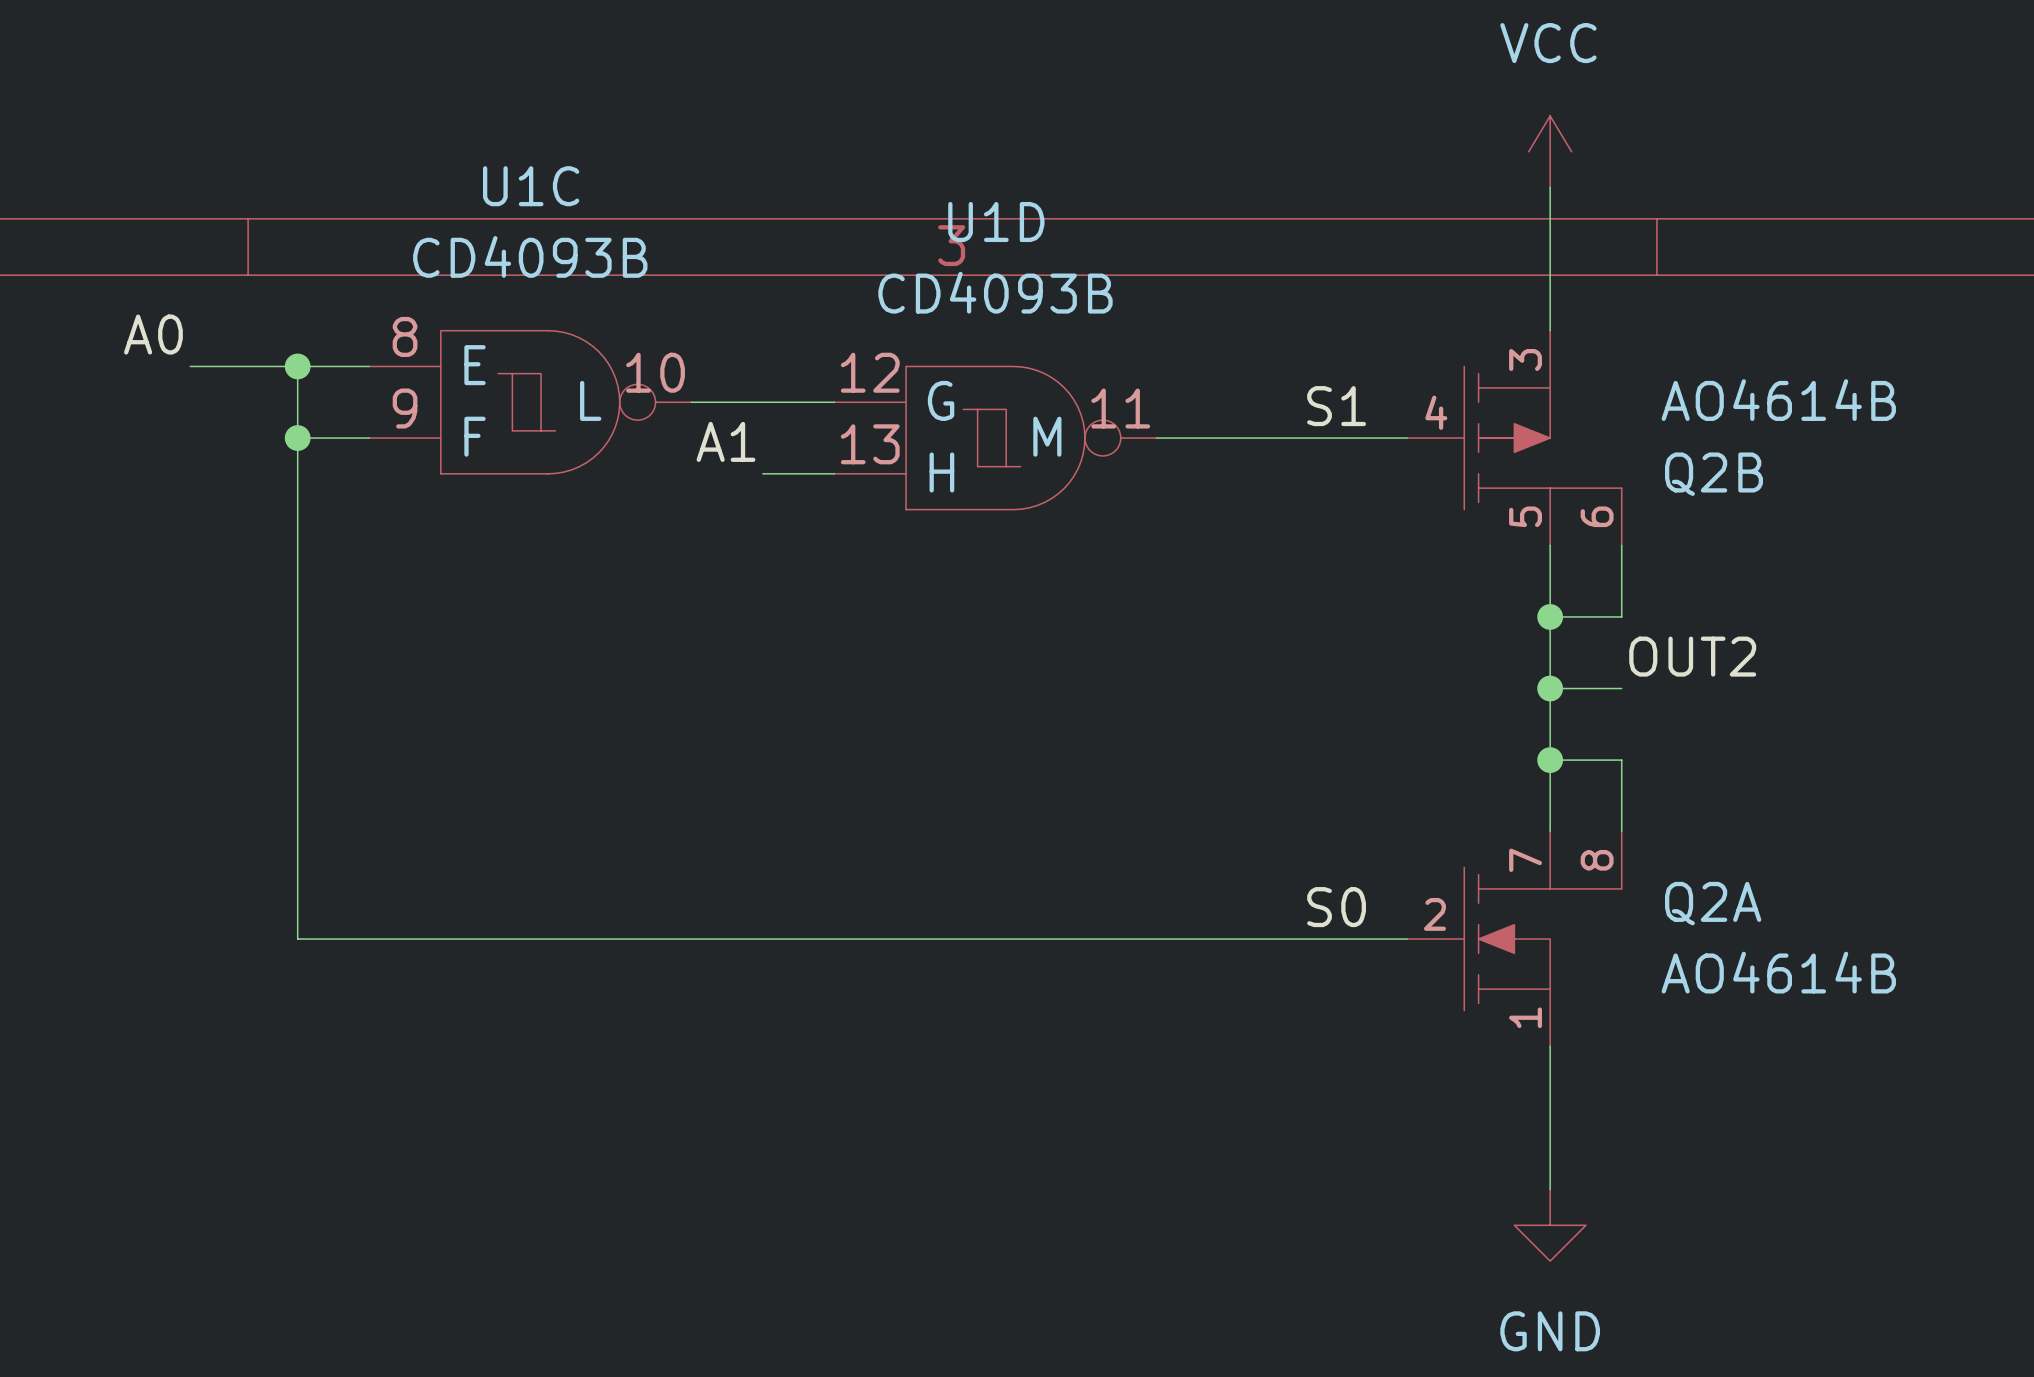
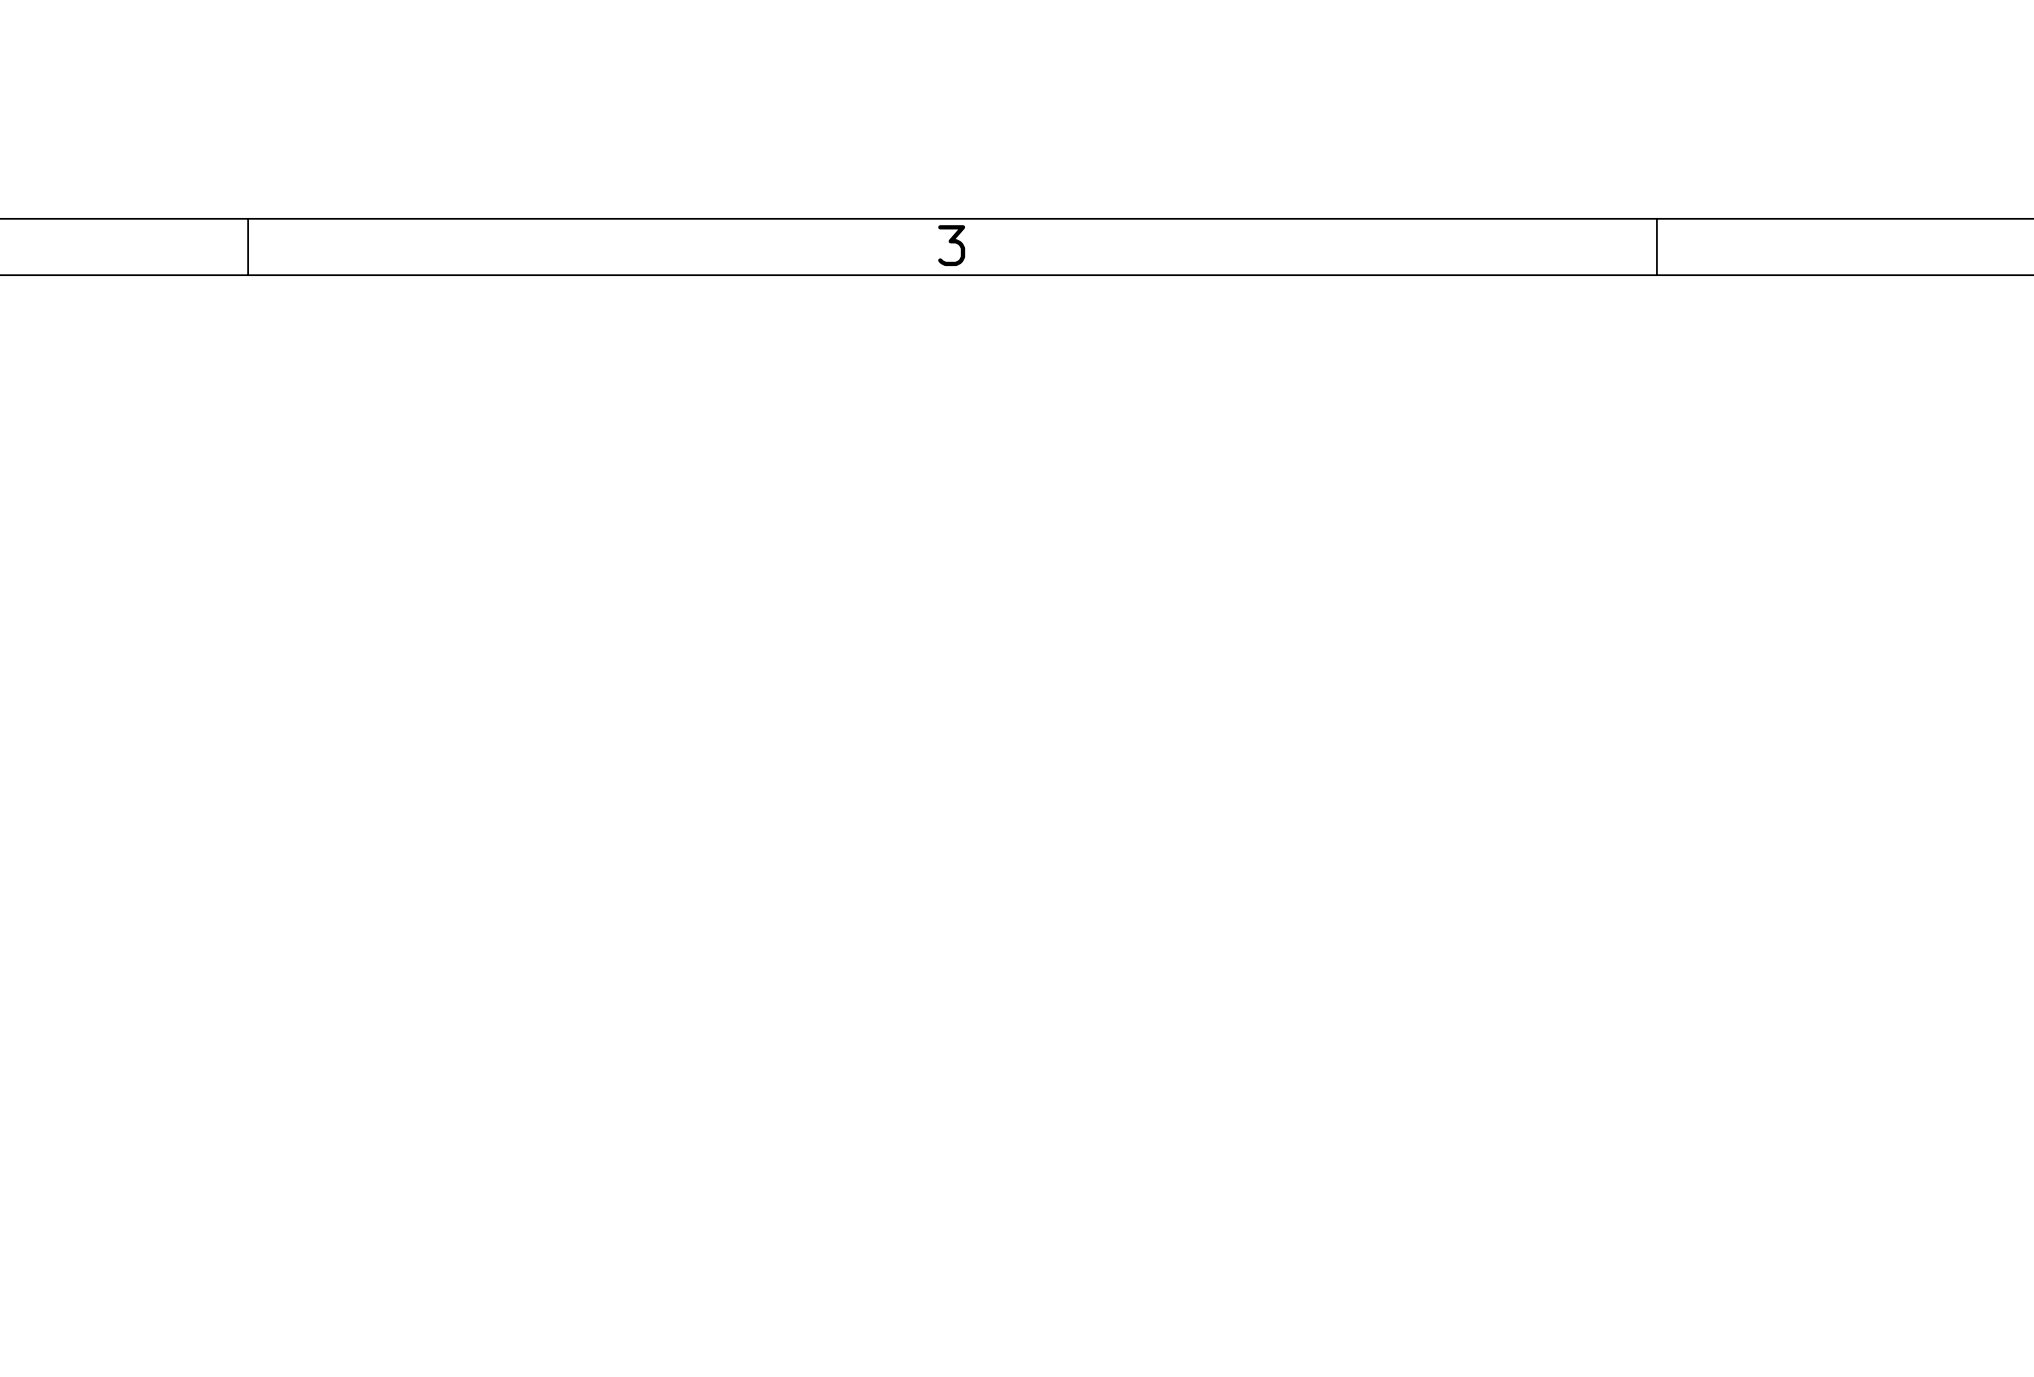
power symbol: VCC (1550, 151) -> none
wire: (1550, 187) (1550, 330) -> none
label: A0 (153, 334) -> none
wire: (190, 366) (369, 366) -> none
wire: (297, 366) (297, 939) (1407, 939) -> none
junction: (297, 366) -> none
U1C: CD4093B (530, 402) -> none
wire: (691, 402) (834, 402) -> none
label: S1 (1336, 406) -> none
wire: (297, 438) (369, 438) -> none
junction: (297, 438) -> none
U1D: CD4093B (995, 438) -> none
wire: (1156, 438) (1407, 438) -> none
Q2B: AO4614B (1514, 438) -> none
label: A1 (725, 441) -> none
wire: (762, 473) (834, 473) -> none
wire: (1550, 545) (1550, 831) -> none
wire: (1621, 545) (1621, 616) (1550, 616) -> none
junction: (1550, 616) -> none
label: OUT2 (1692, 656) -> none
wire: (1550, 688) (1621, 688) -> none
junction: (1550, 688) -> none
wire: (1550, 760) (1621, 760) (1621, 831) -> none
junction: (1550, 760) -> none
label: S0 (1336, 907) -> none
Q2A: AO4614B (1514, 939) -> none
wire: (1550, 1046) (1550, 1189) -> none
power symbol: GND (1550, 1225) -> none

